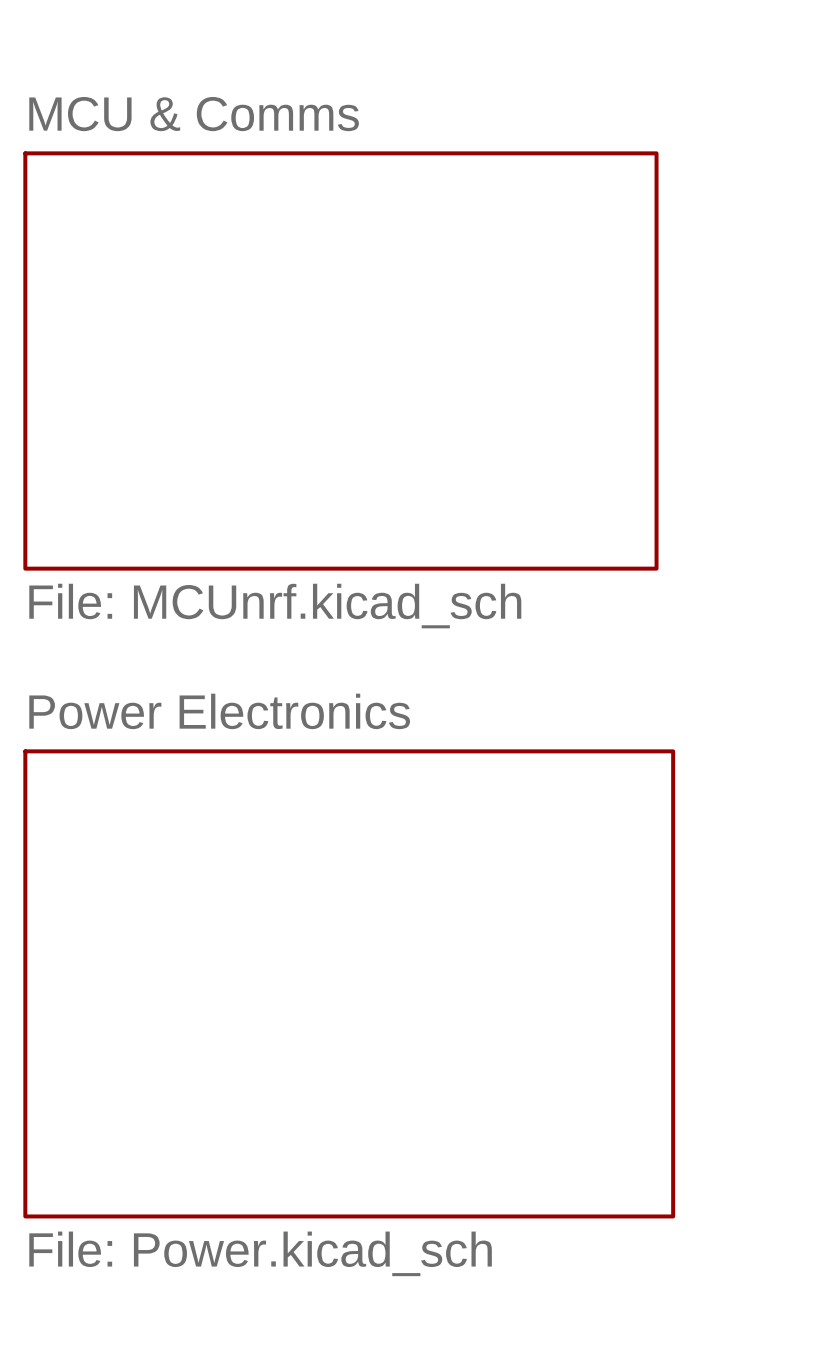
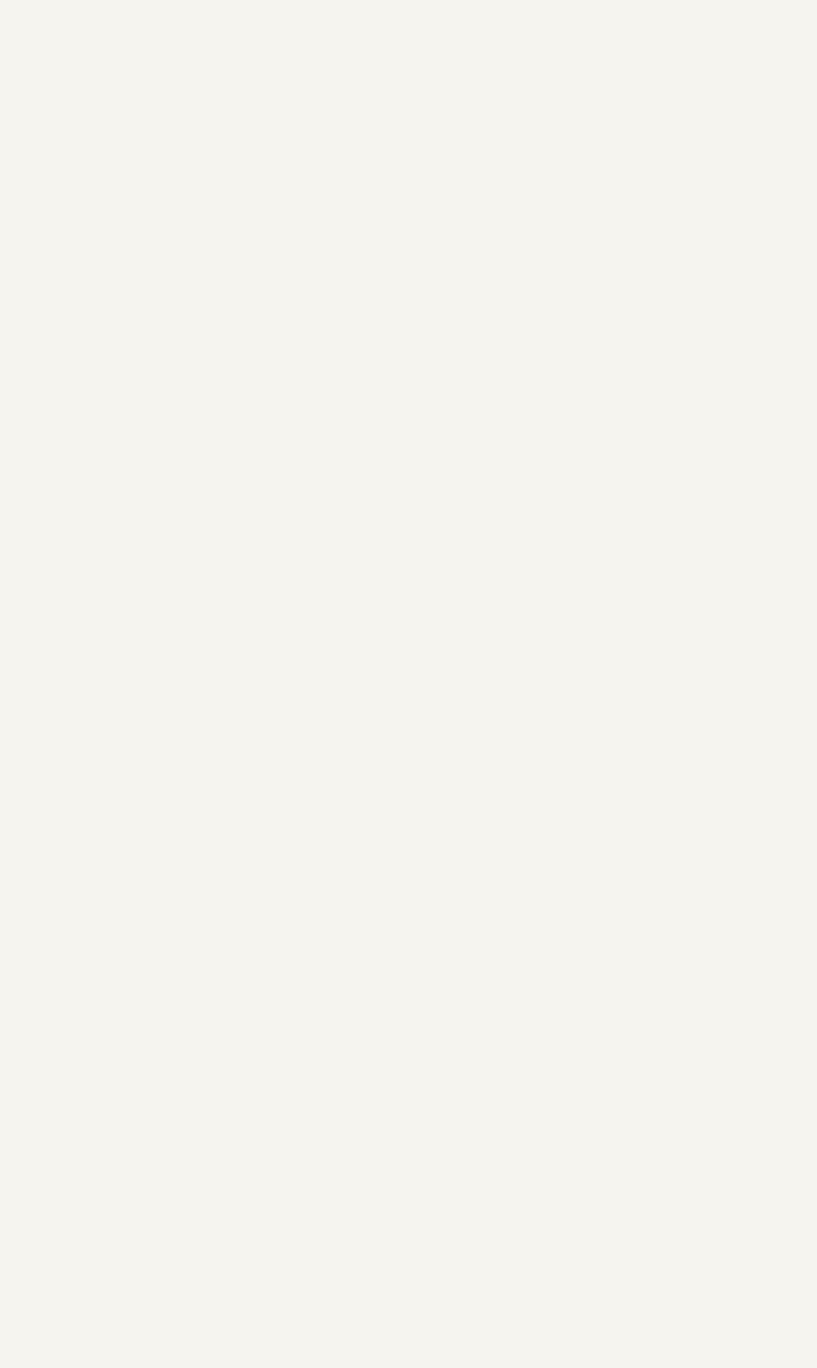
sheet MCU & Comms: File: MCUnrf.kicad_sch (340, 361) -> none
sheet Power Electronics: File: Power.kicad_sch (349, 983) -> none

